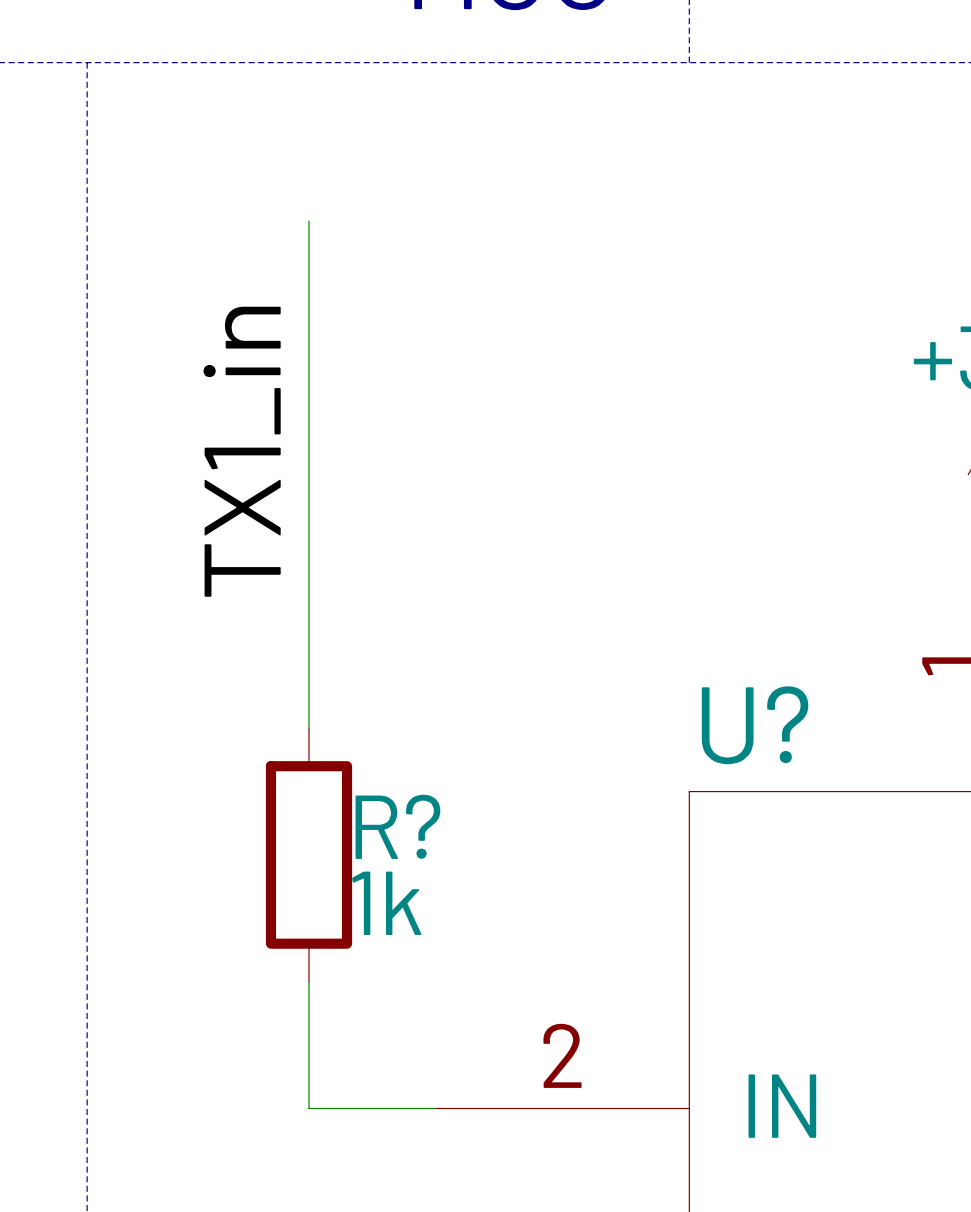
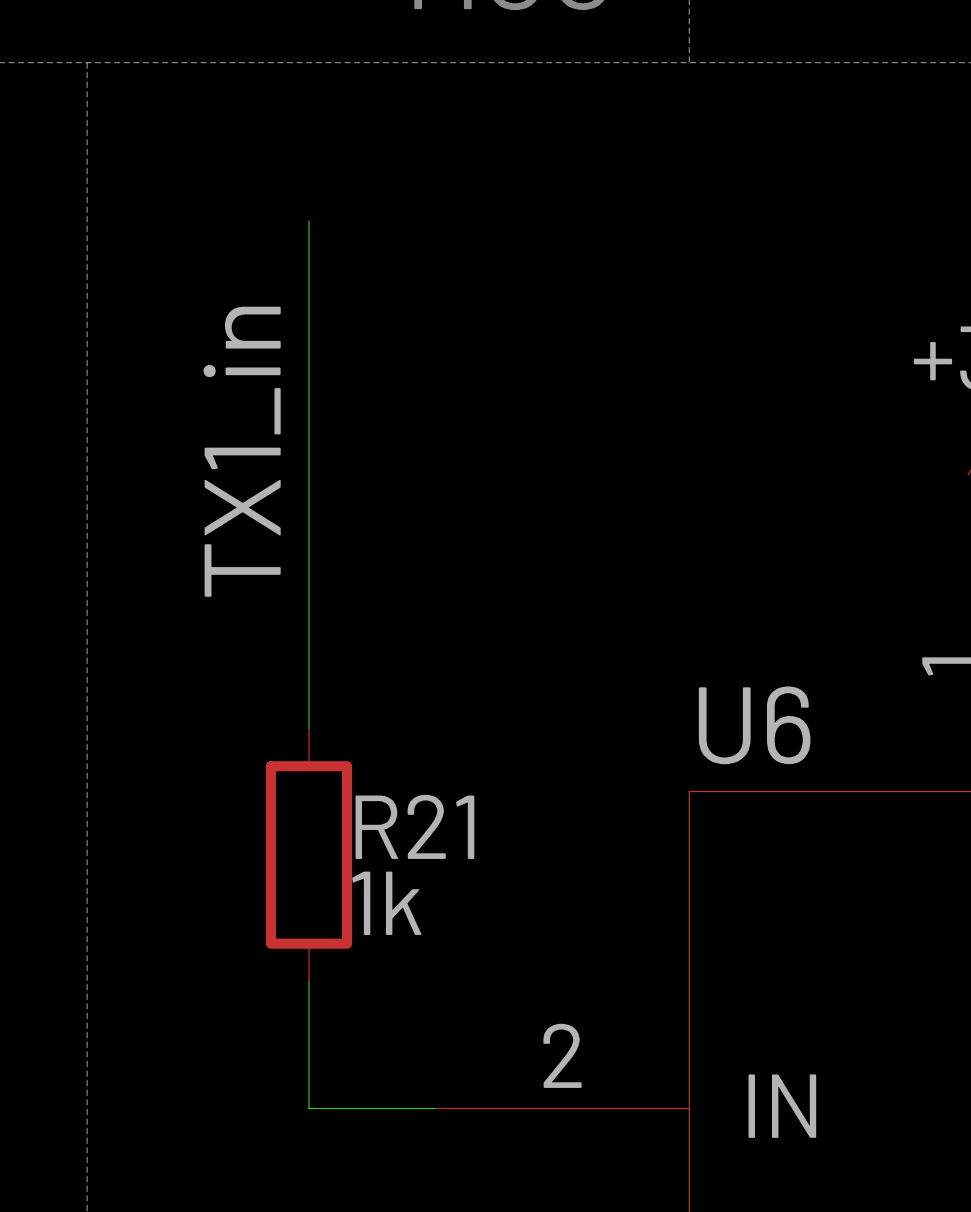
U? name: U? (755, 725) -> U6 (754, 725)
R? name: R? (397, 826) -> R21 (414, 826)

